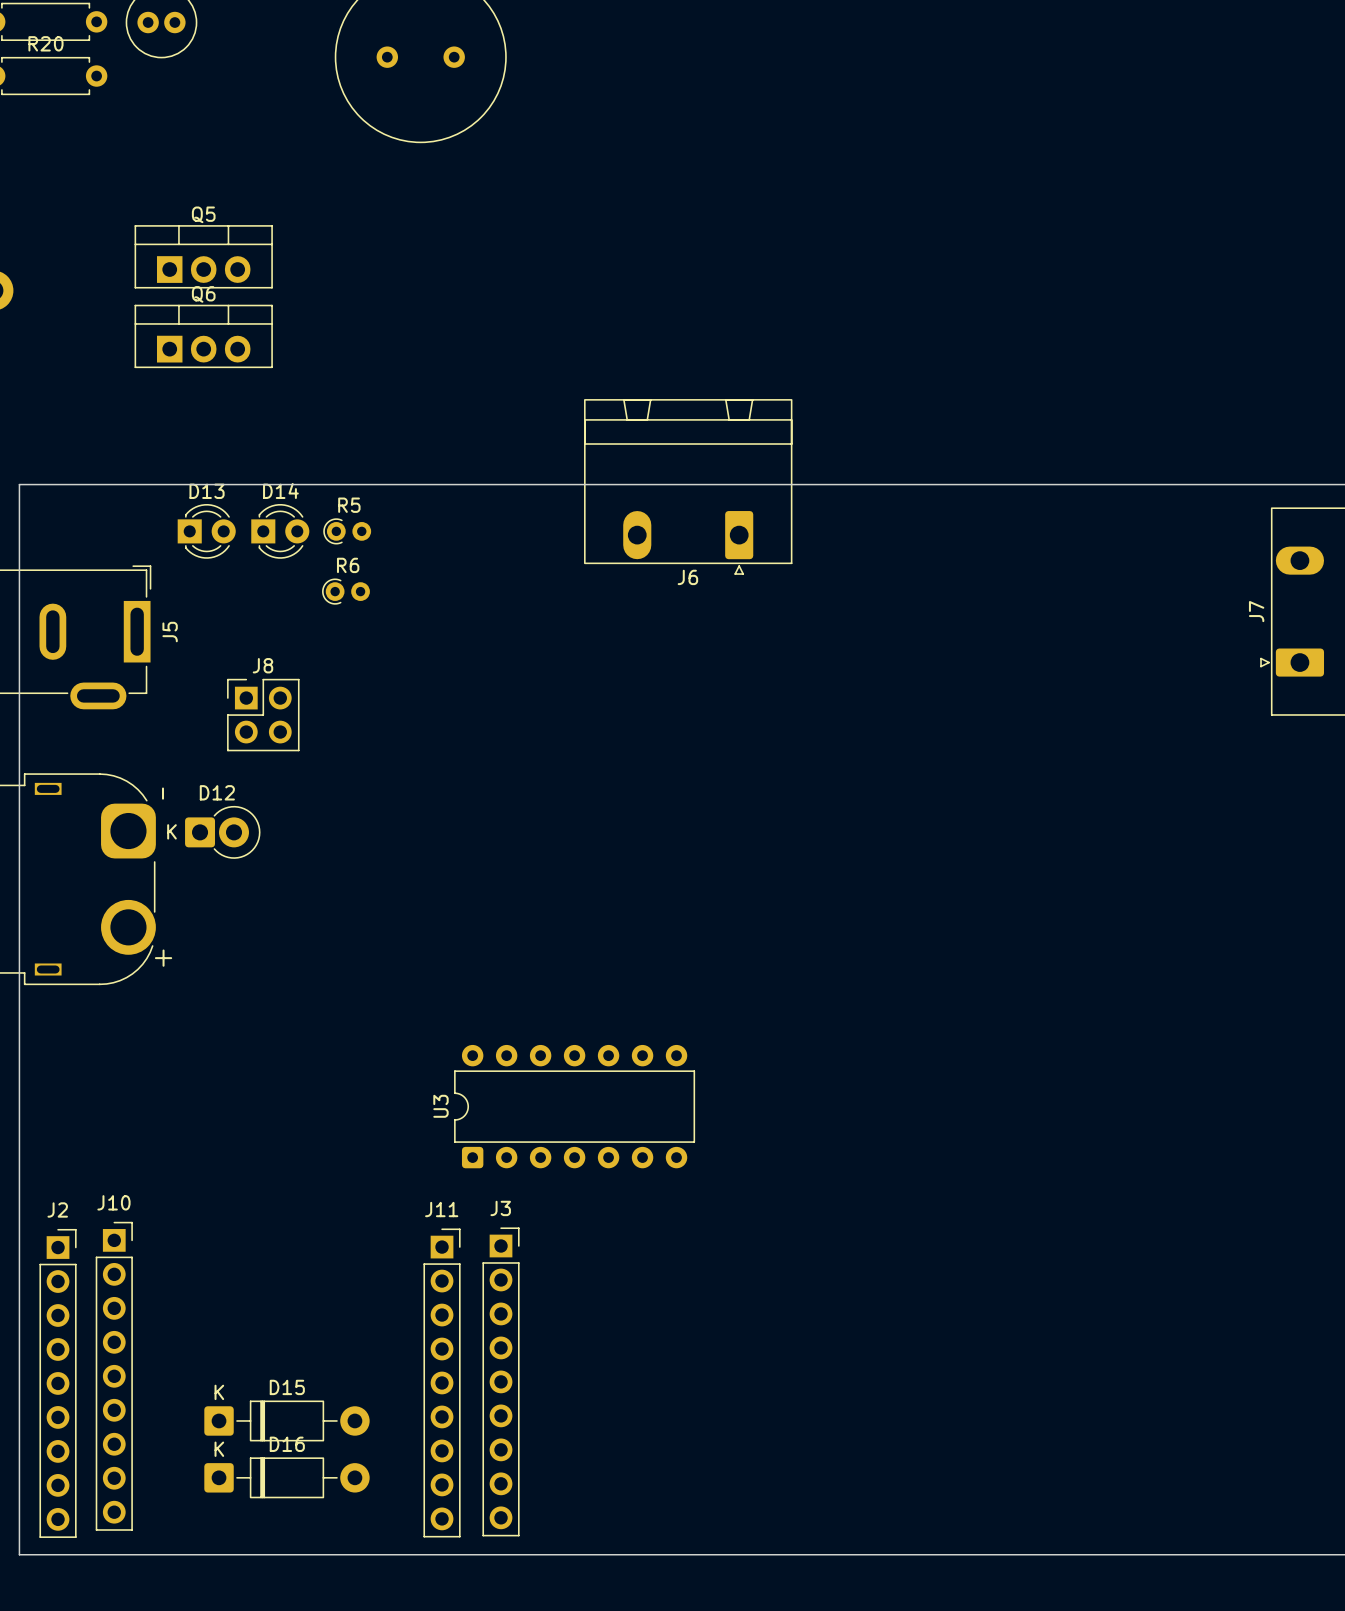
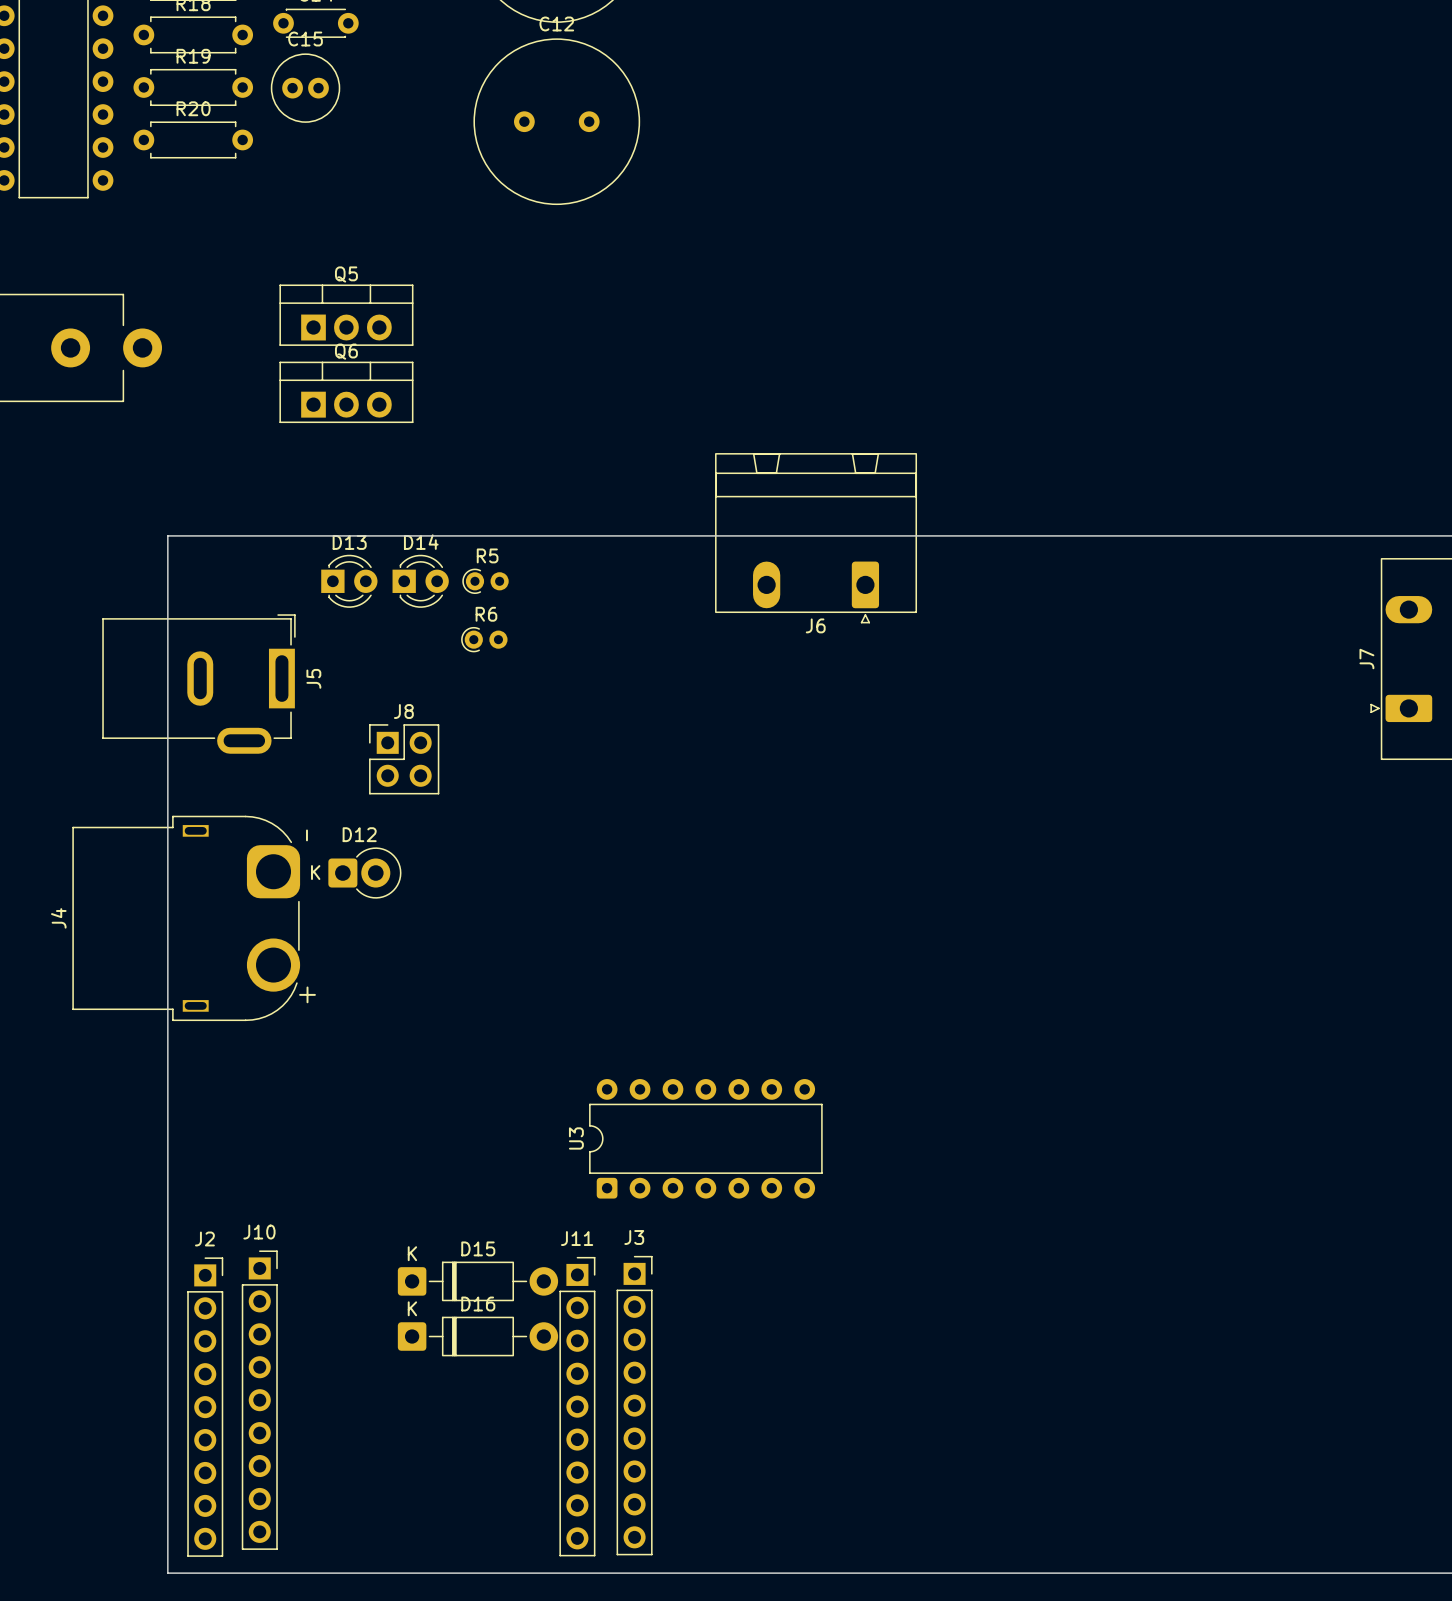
D15 position: (286, 1420) -> (477, 1281)
D16 position: (286, 1477) -> (477, 1336)

